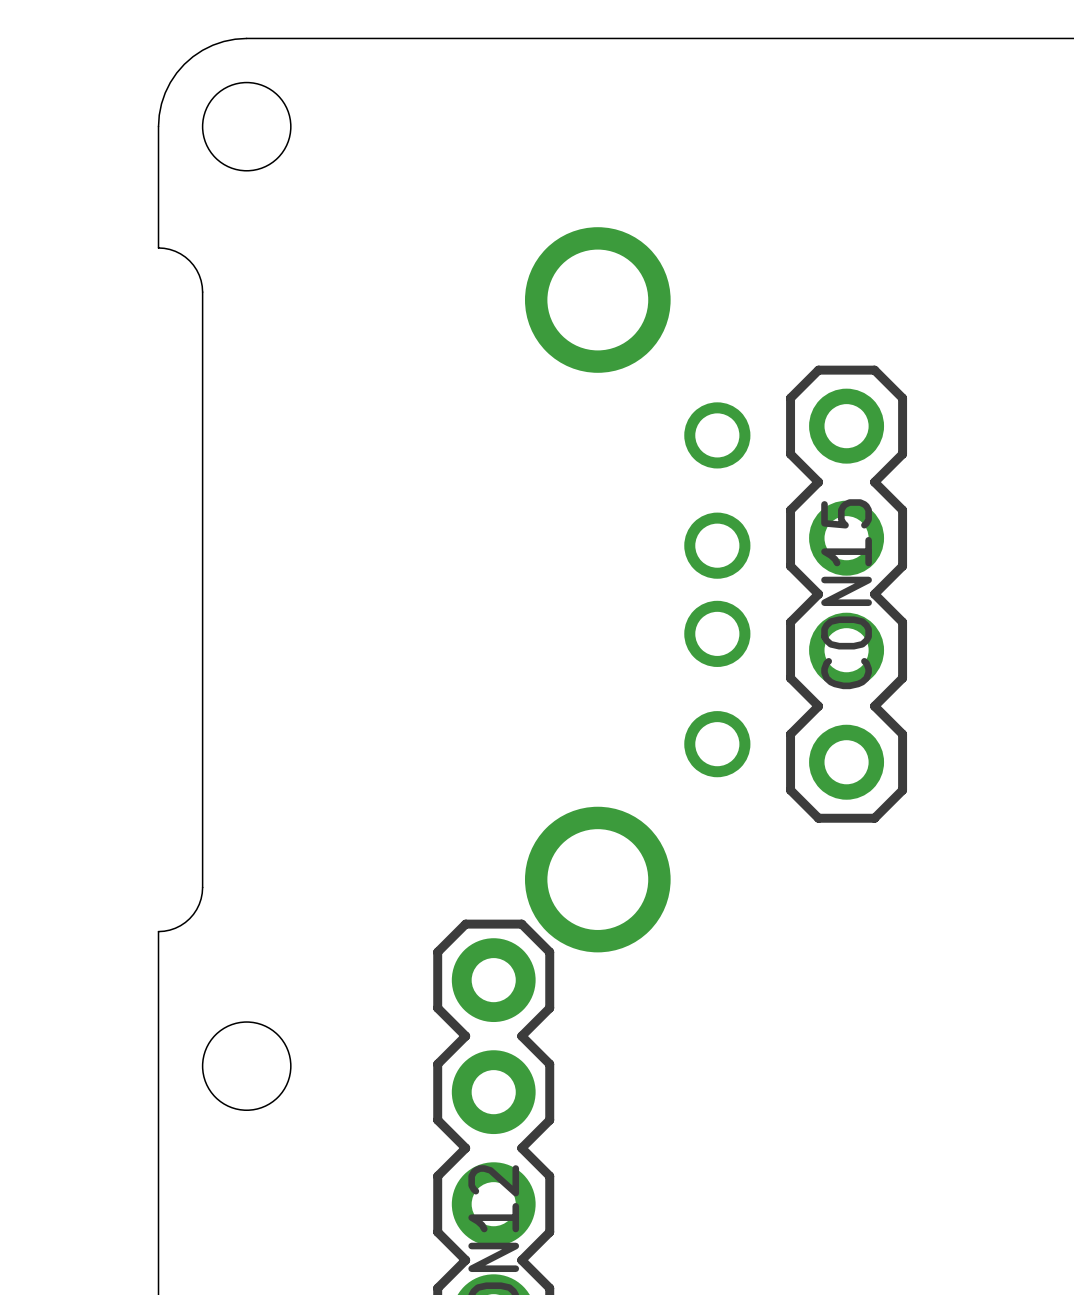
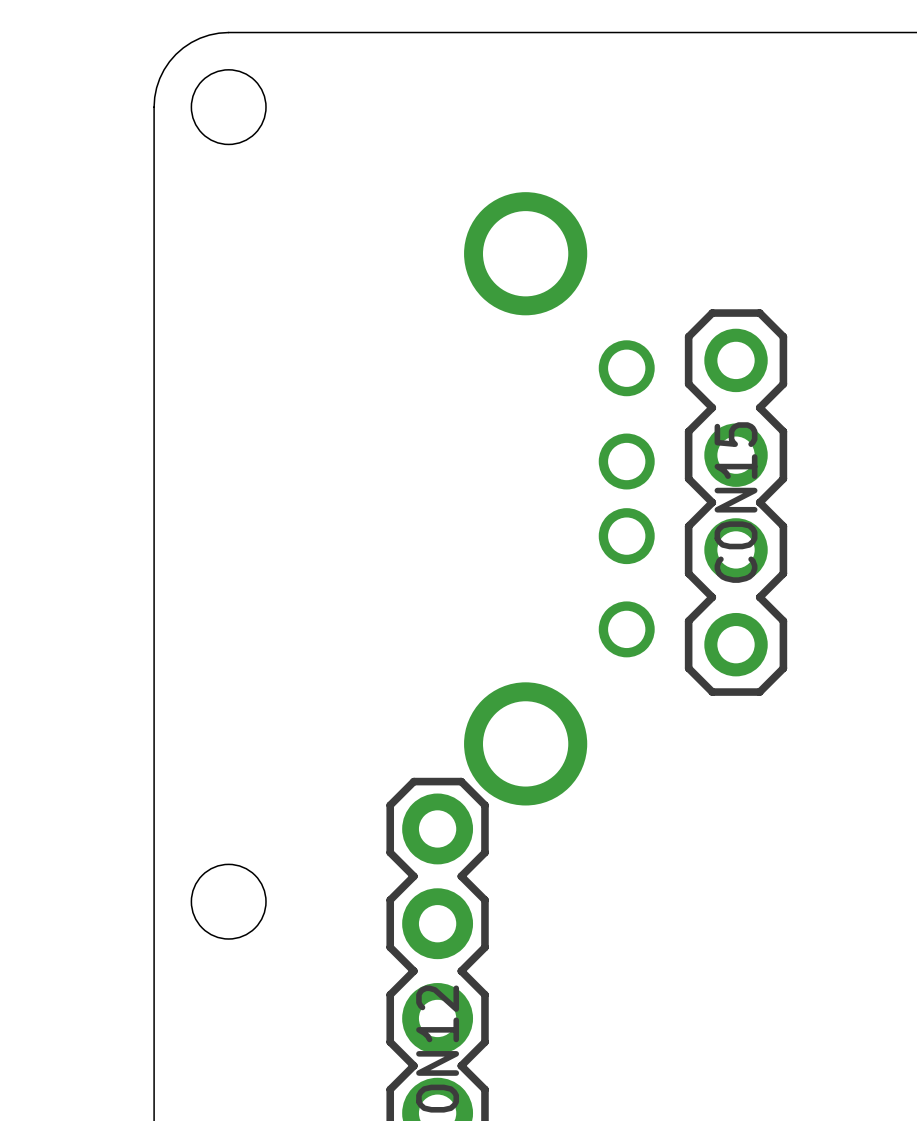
board edge: (158, 247) (175, 251) (189, 260) (199, 275) (202, 292) (202, 893) (196, 909) (185, 922) (175, 928) (158, 931) -> (154, 209) (154, 787)

